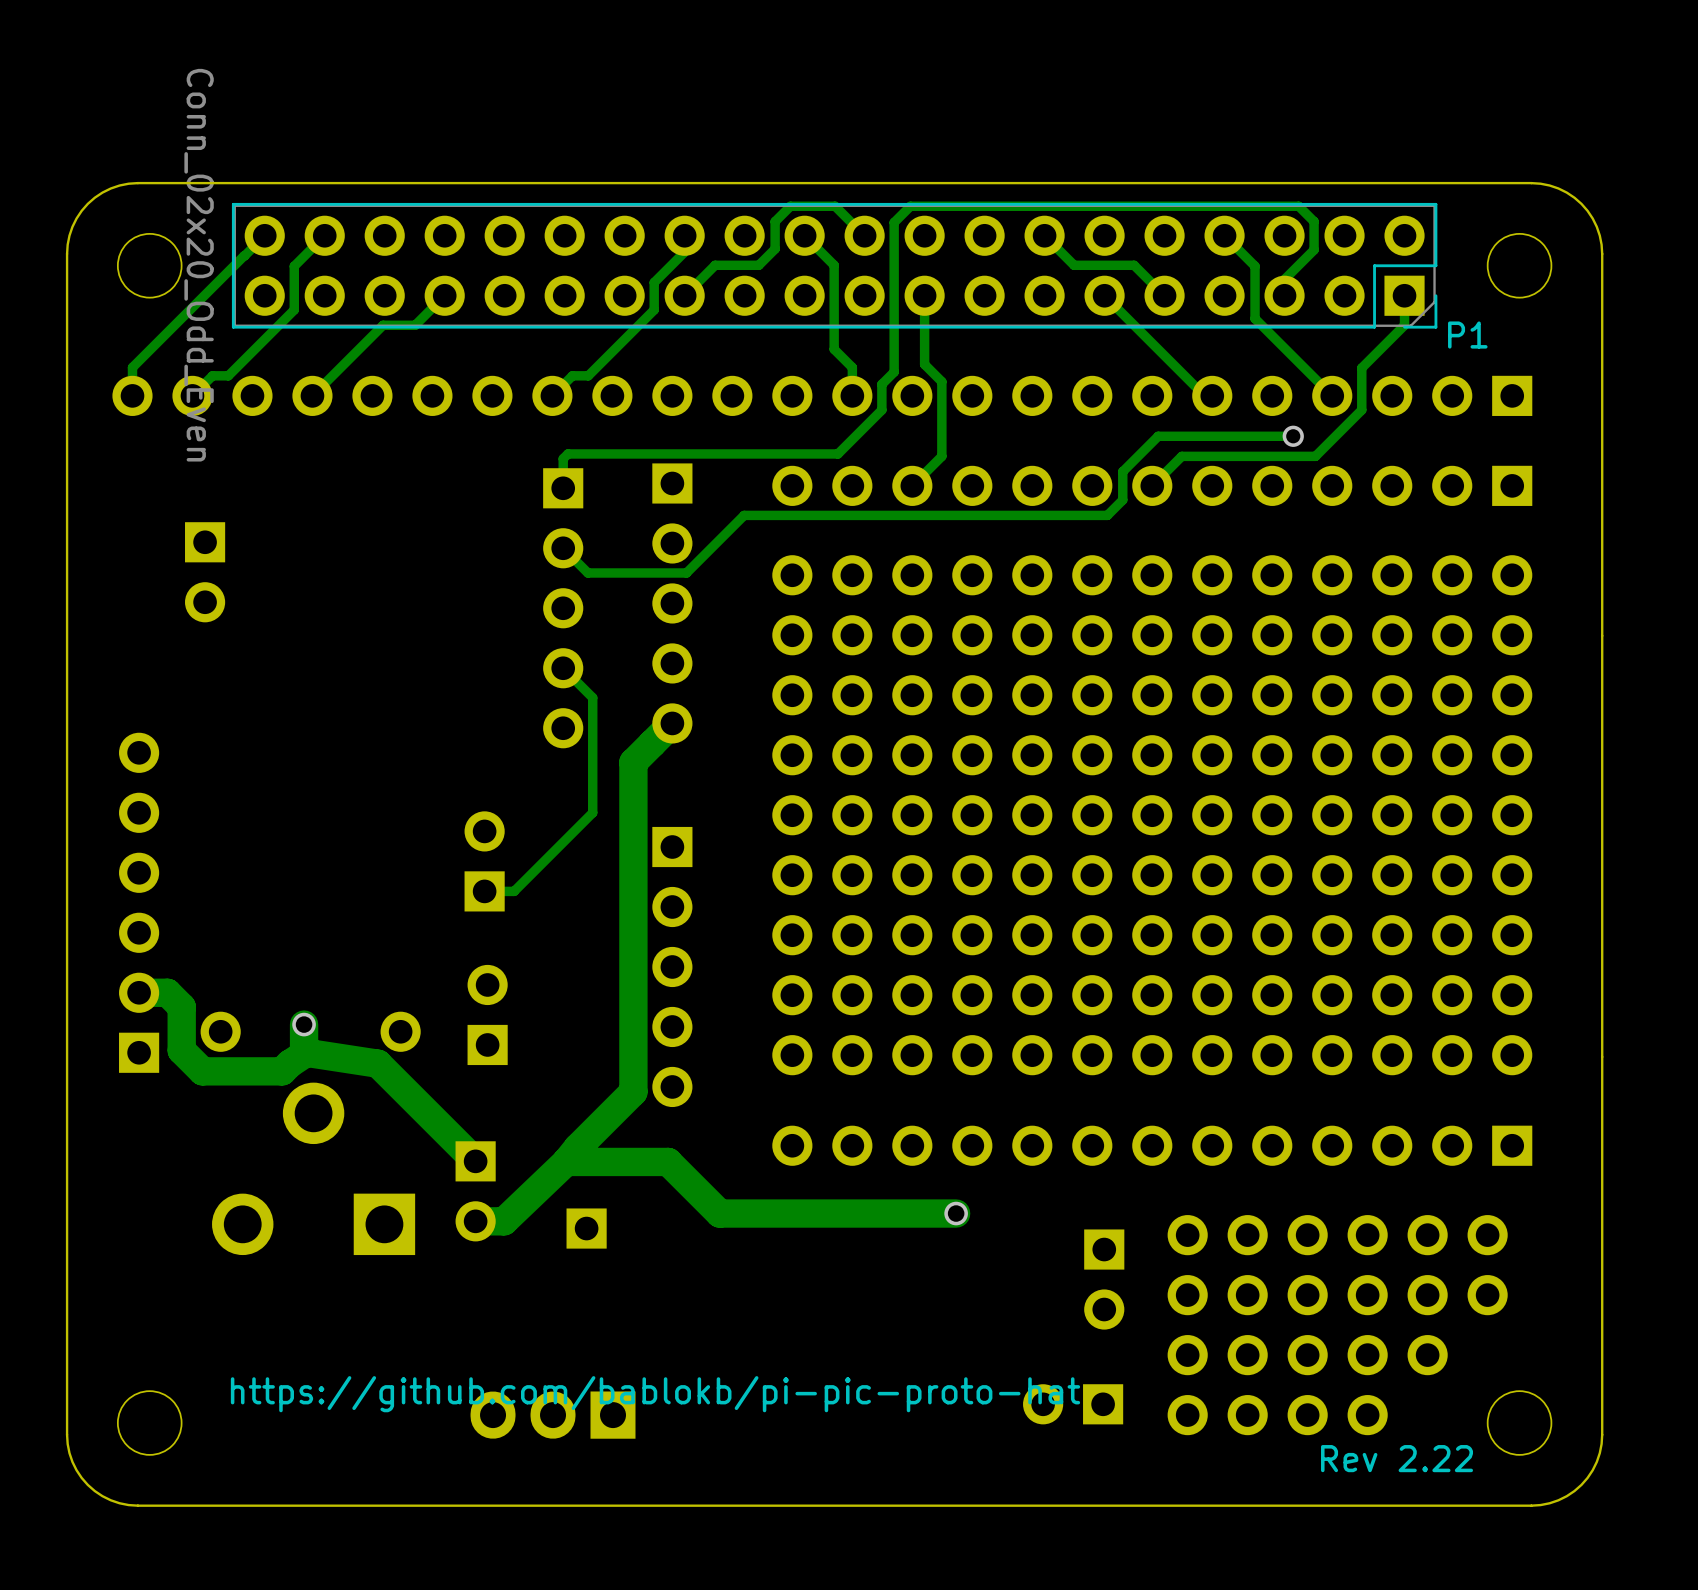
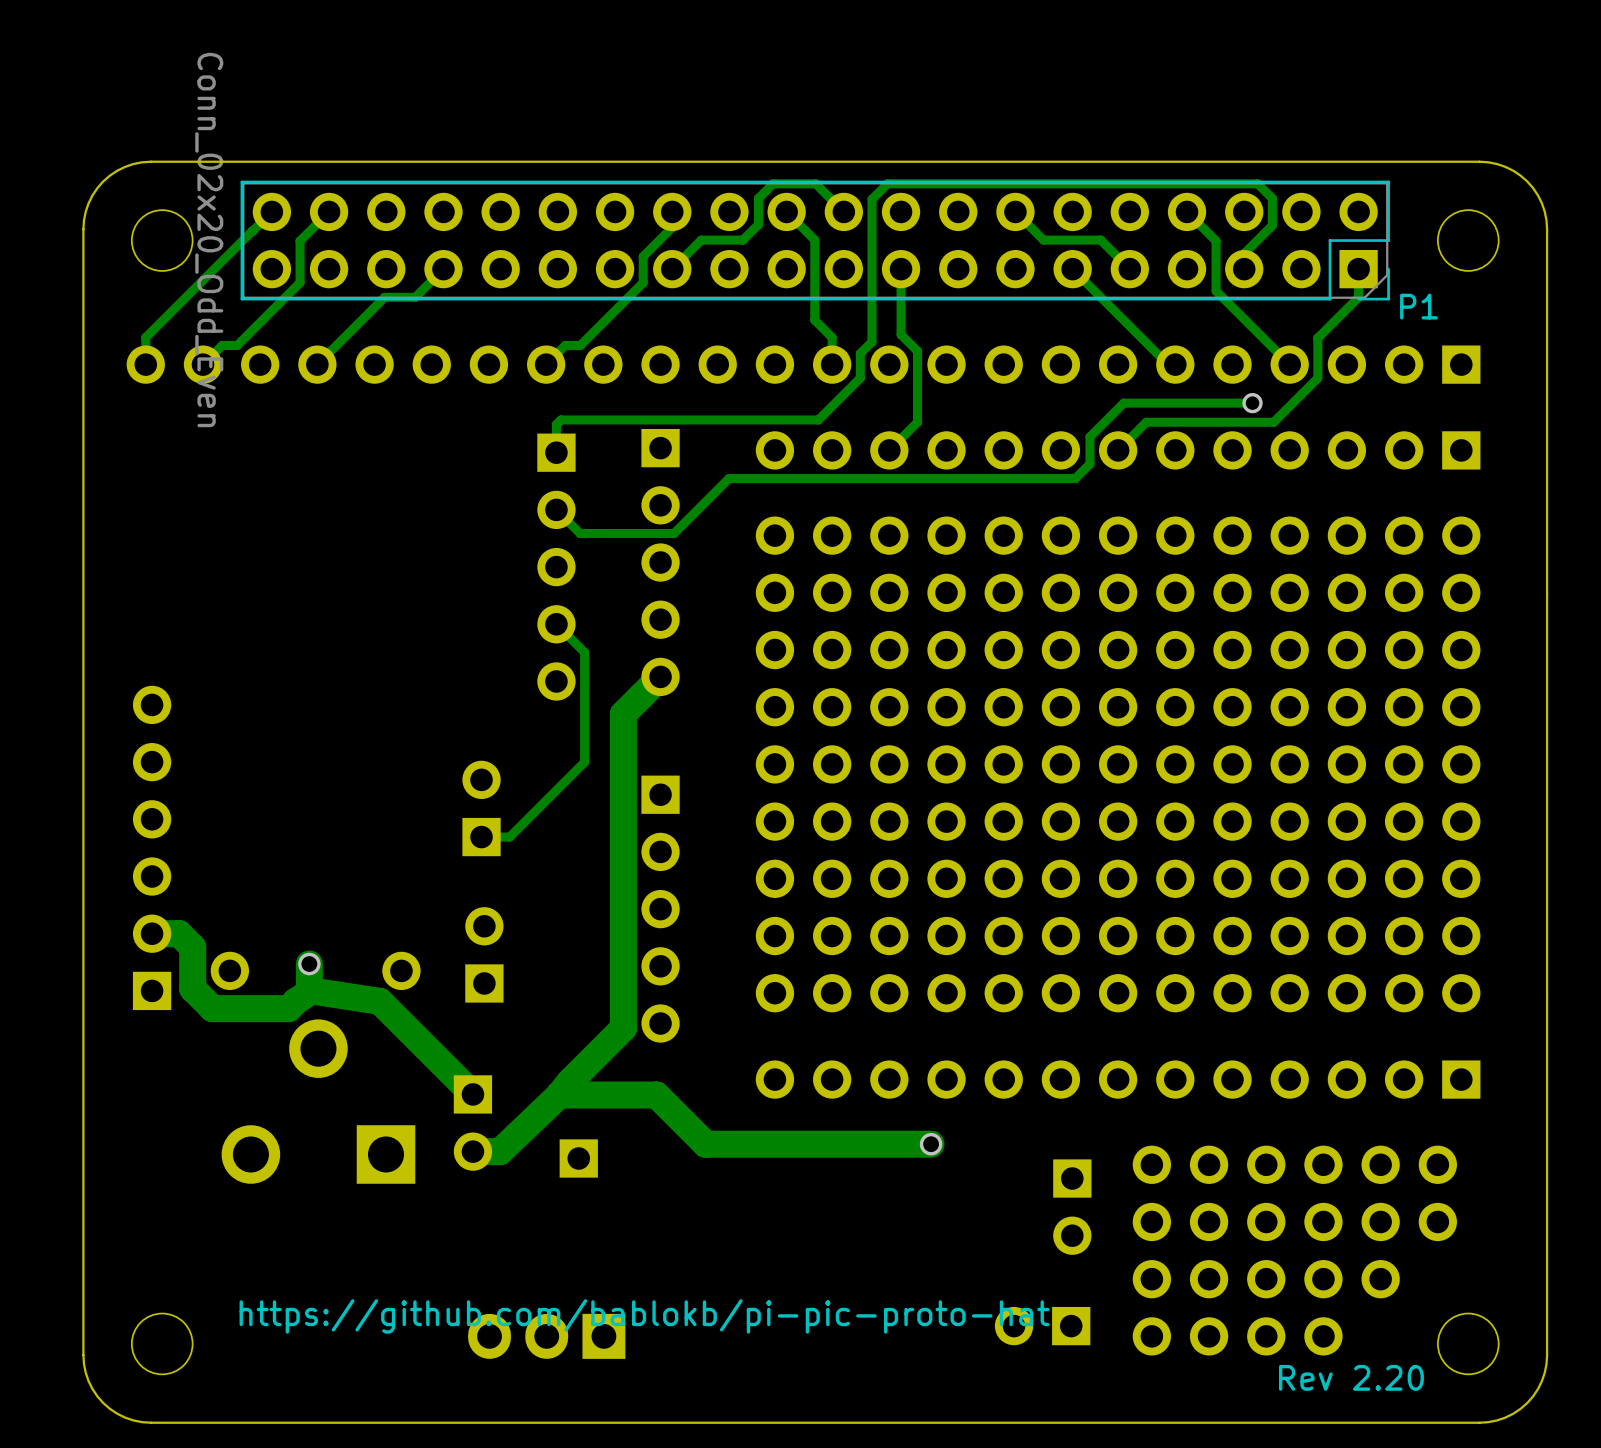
part: (205, 572) -> none
text: Rev 2.22 (1397, 1458) -> Rev 2.20 (1351, 1377)

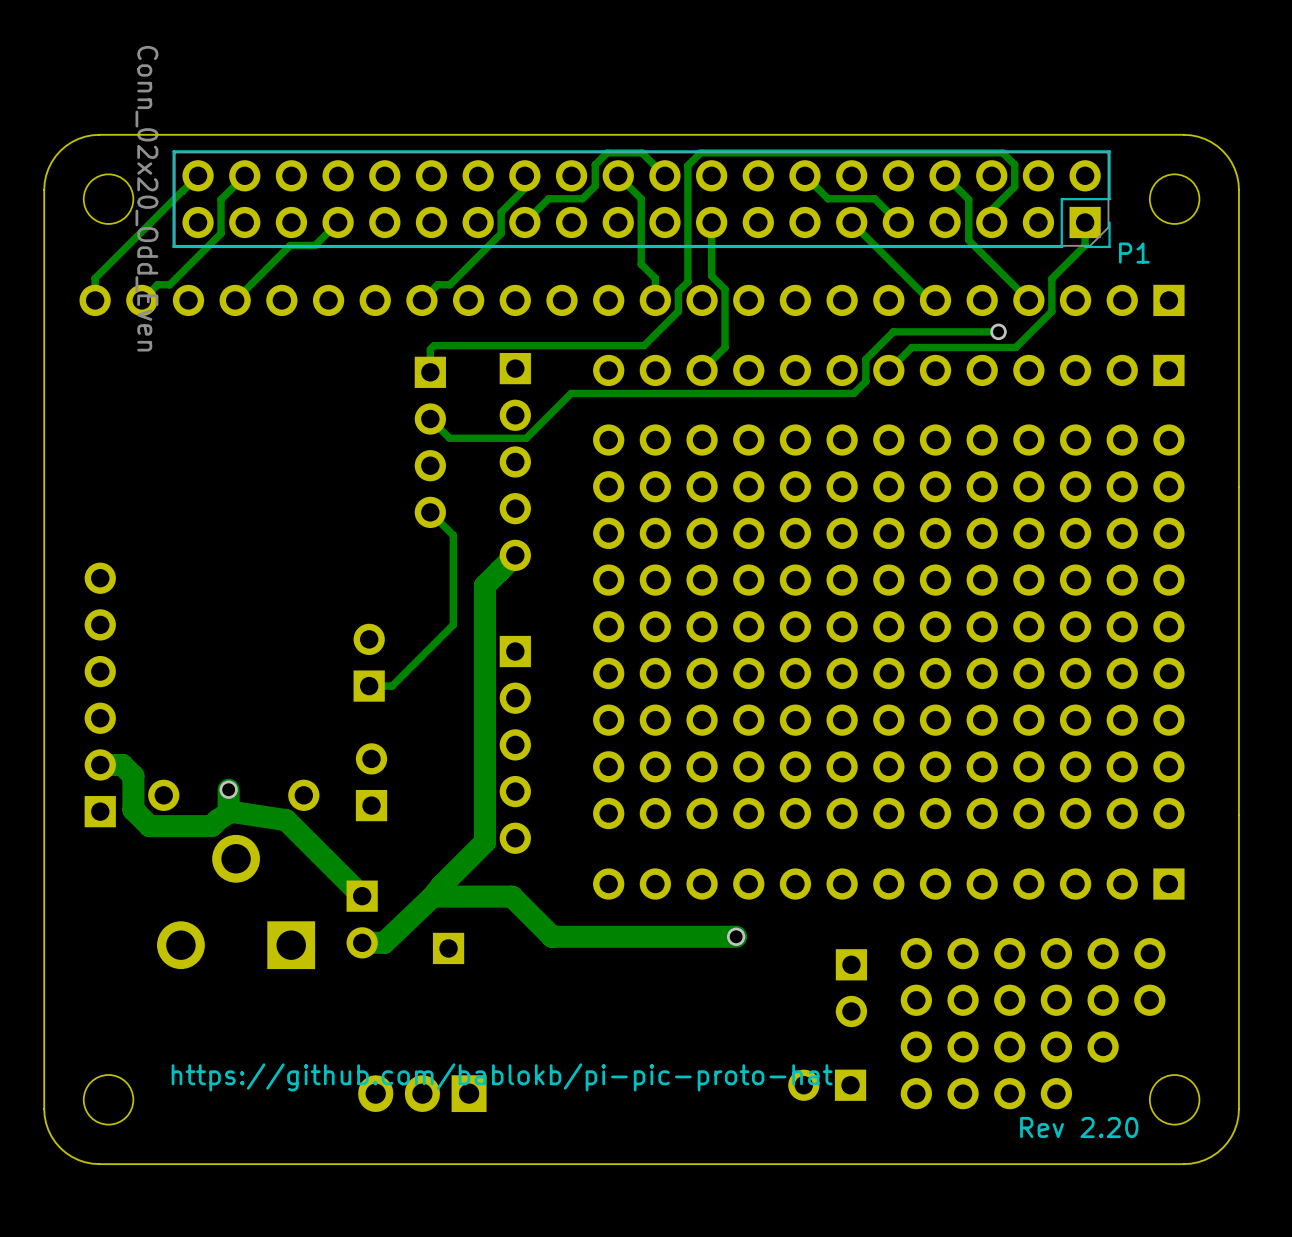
part: (556, 567) -> none

